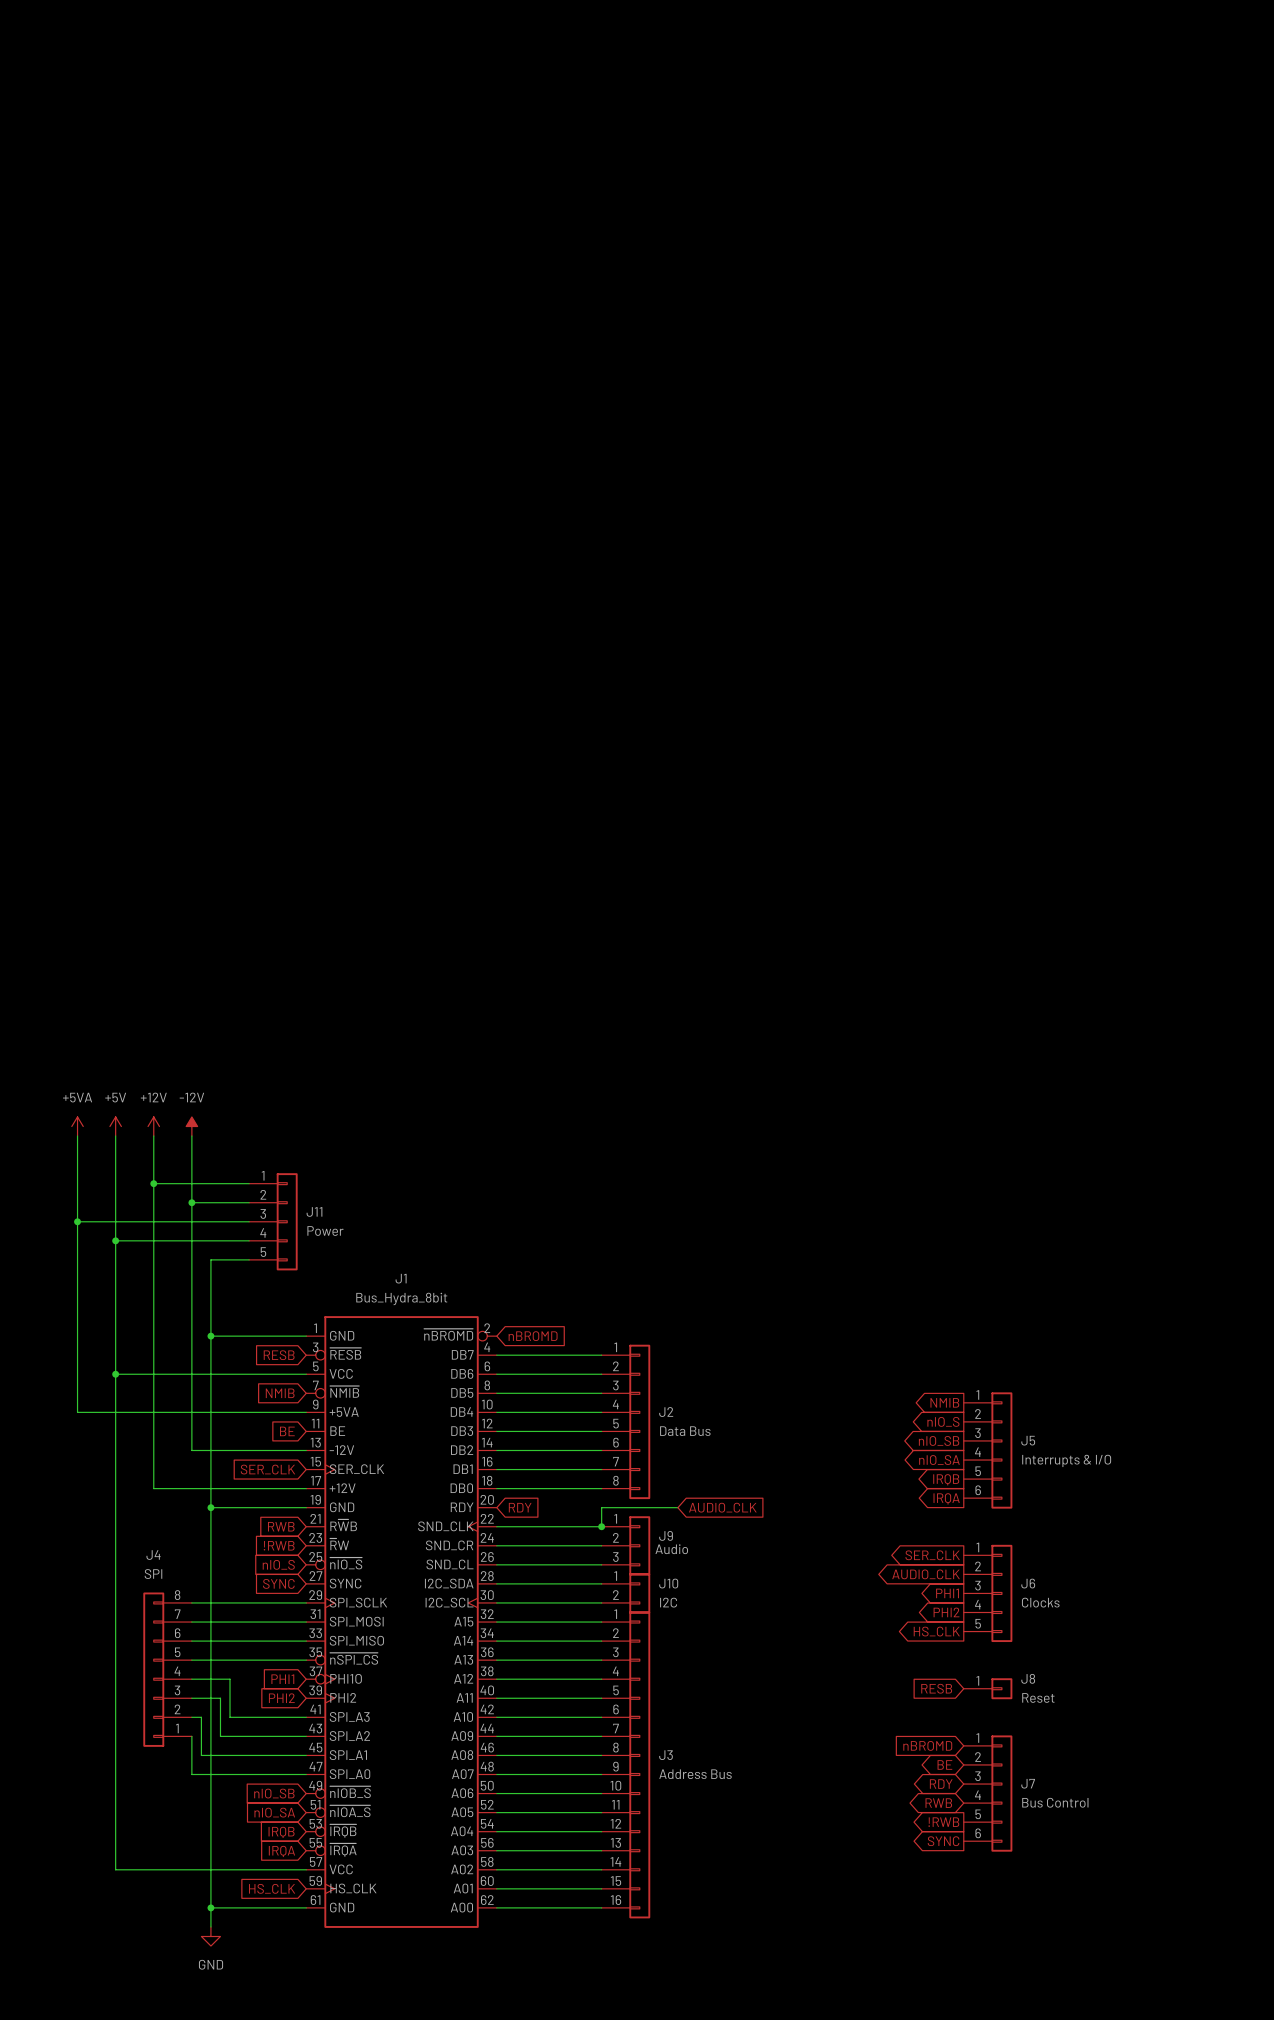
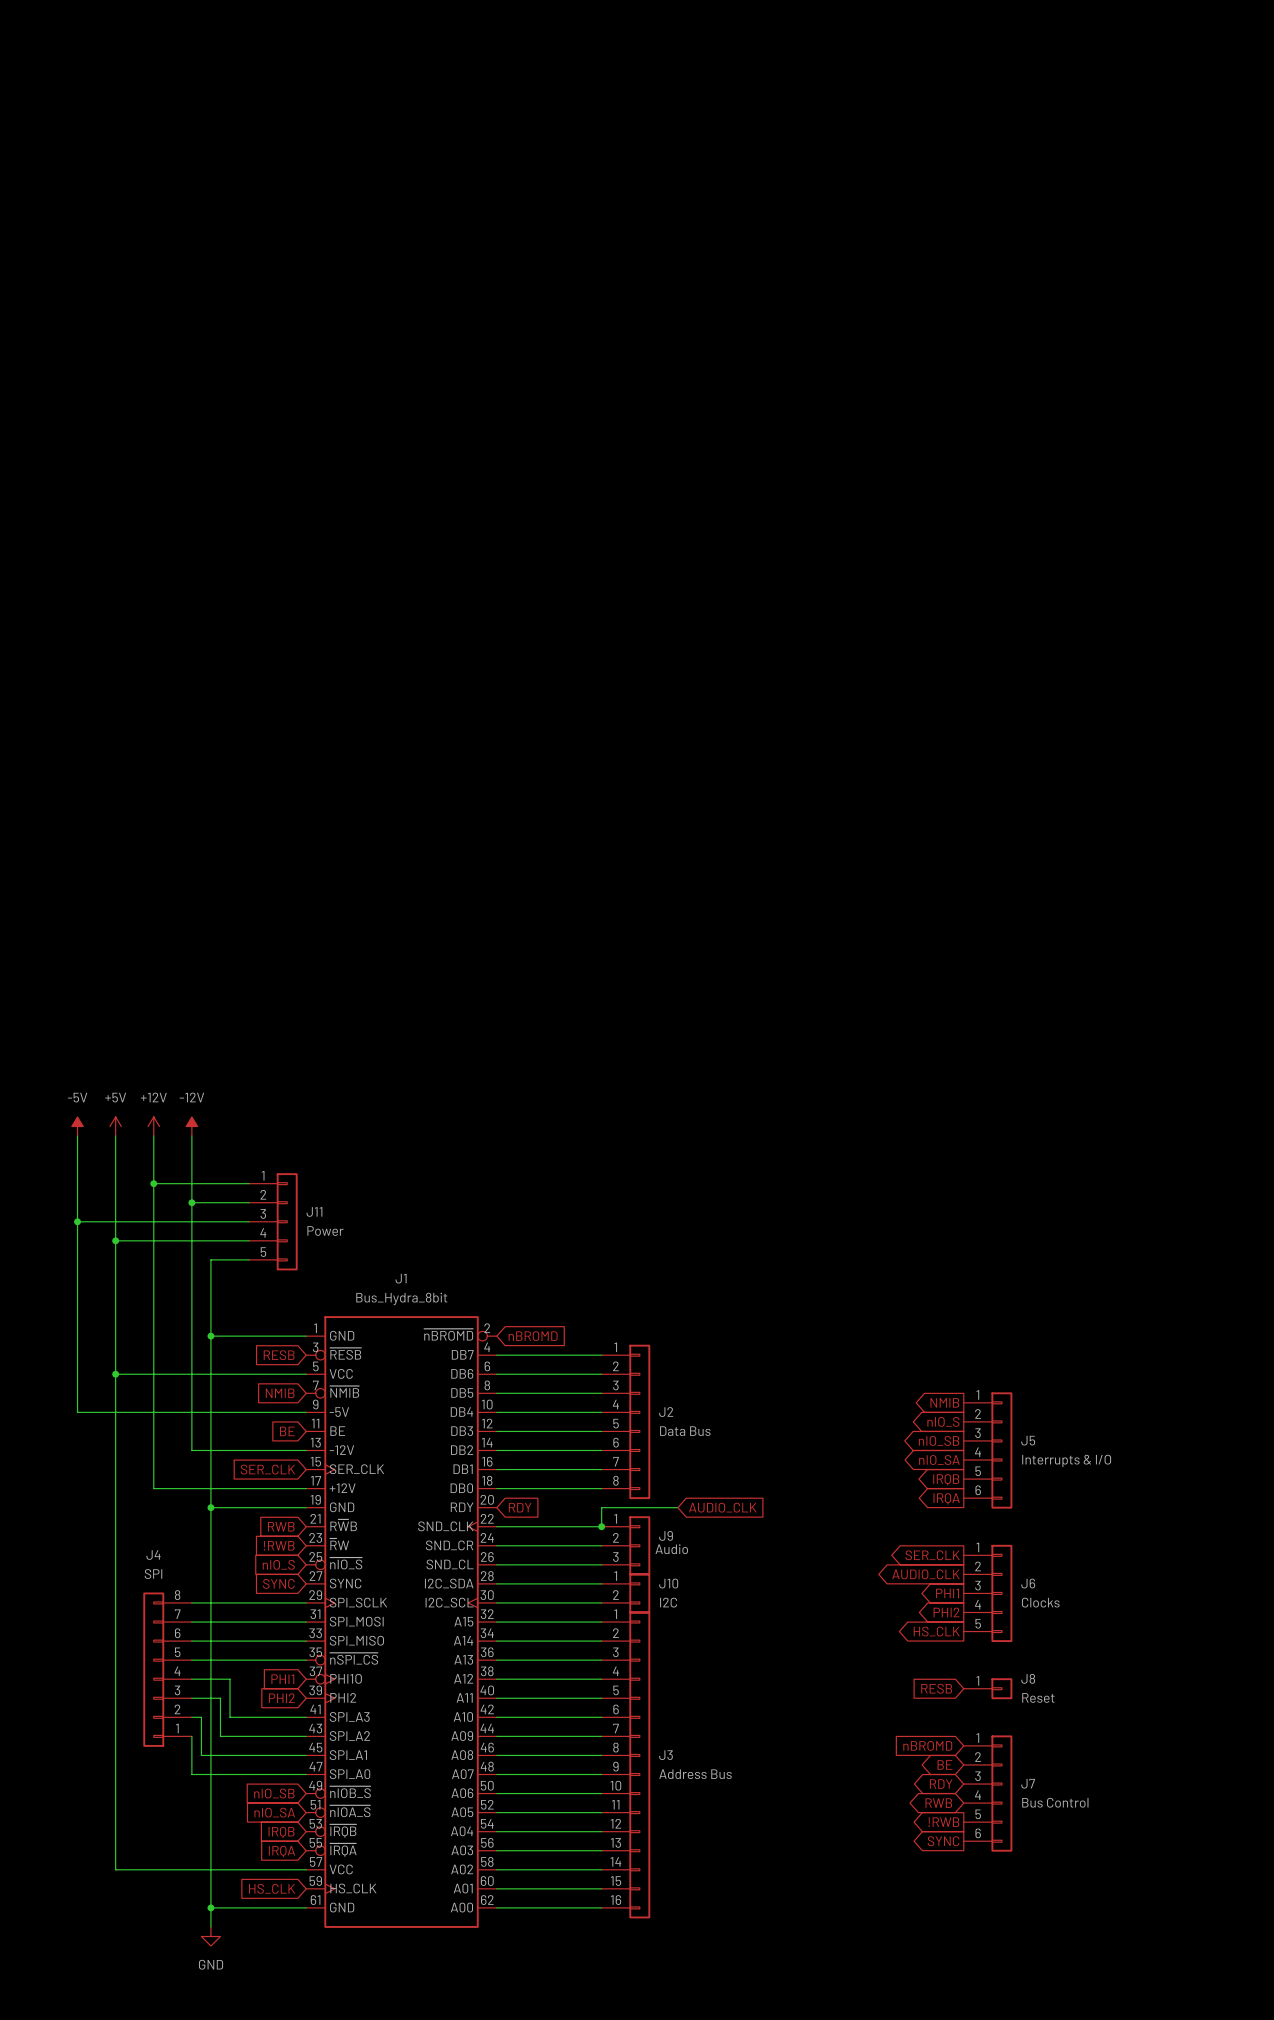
power symbol: +5VA (77, 1126) -> -5V (77, 1126)
J1 pin name: +5VA (344, 1412) -> -5V (339, 1412)

